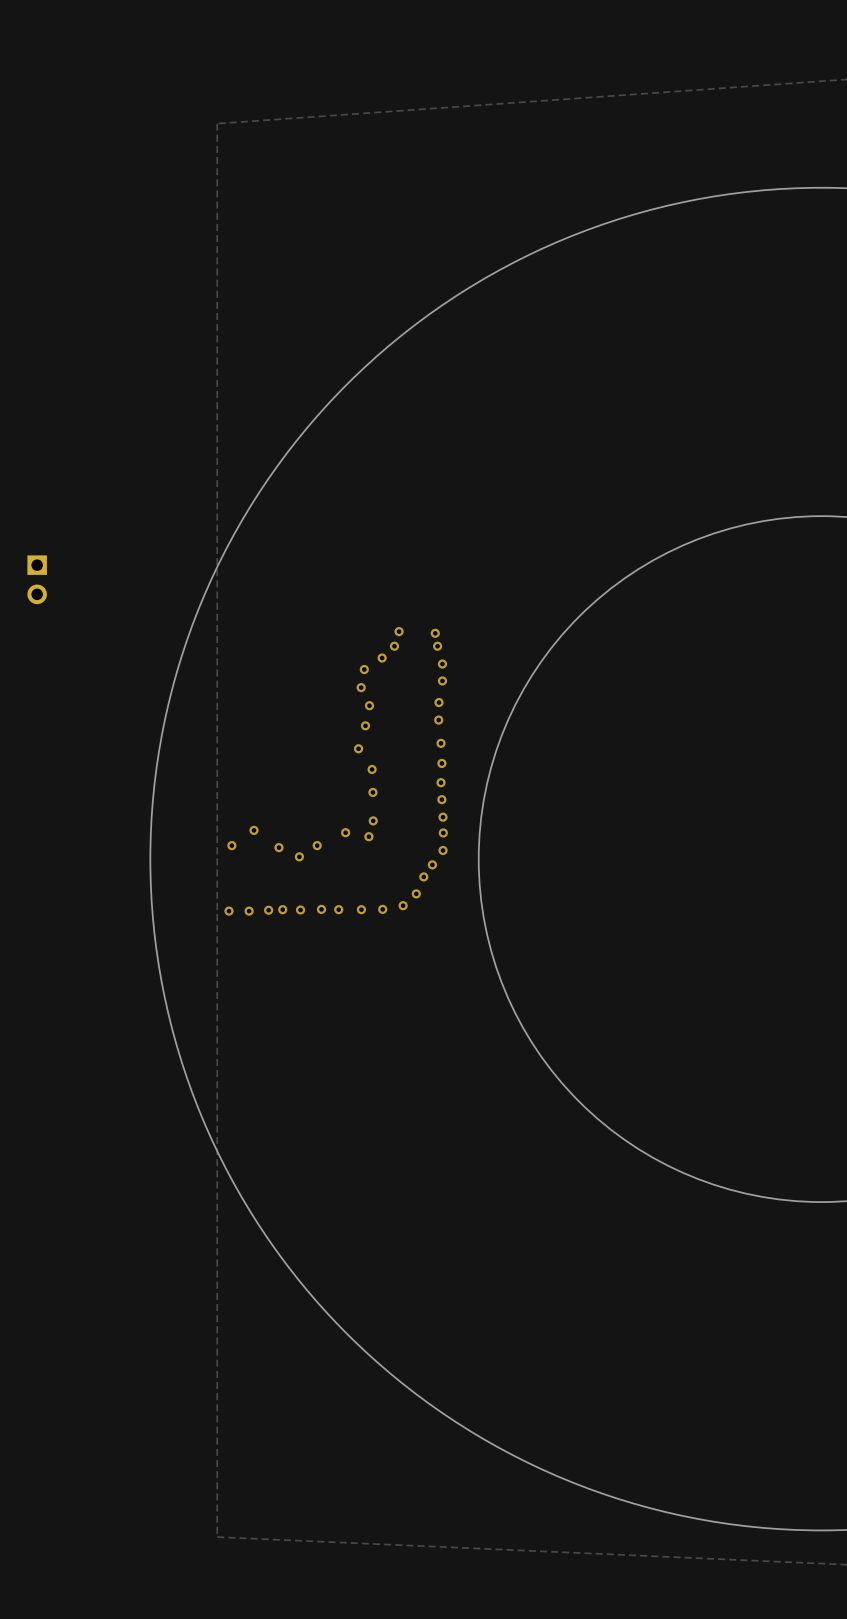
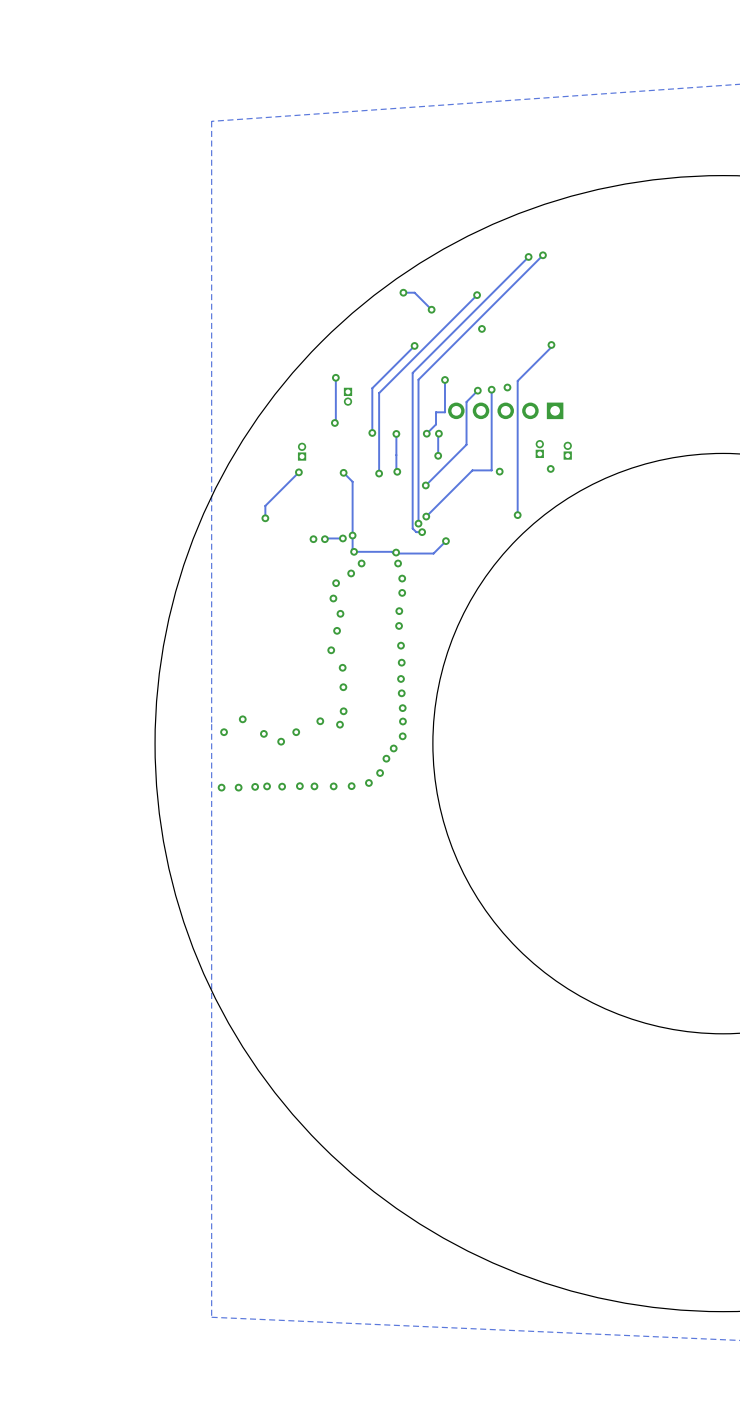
track: none -> (542, 255) (418, 379) (418, 523)
via: none -> (542, 255)
track: none -> (528, 256) (412, 372) (412, 528) (416, 532) (422, 532)
via: none -> (528, 256)
track: none -> (403, 292) (414, 292) (431, 309)
via: none -> (403, 292)
track: none -> (477, 295) (379, 393) (379, 473)
via: none -> (477, 295)
via: none -> (431, 309)
via: none -> (481, 328)
track: none -> (551, 344) (517, 380) (517, 515)
via: none -> (551, 344)
track: none -> (414, 345) (372, 388) (372, 432)
via: none -> (414, 345)
track: none -> (335, 377) (334, 423)
via: none -> (335, 377)
track: none -> (444, 379) (444, 412) (436, 412) (436, 424) (426, 433)
via: none -> (444, 379)
via: none -> (507, 387)
track: none -> (491, 389) (491, 470) (472, 470) (426, 516)
via: none -> (491, 389)
track: none -> (477, 390) (466, 401) (466, 444) (425, 485)
via: none -> (477, 390)
part: none -> (348, 396)
part: none -> (505, 410)
via: none -> (334, 423)
via: none -> (372, 432)
via: none -> (426, 433)
track: none -> (438, 433) (438, 455)
via: none -> (438, 433)
track: none -> (396, 433) (397, 471)
via: none -> (396, 433)
part: none -> (539, 449)
part: none -> (567, 450)
part: none -> (302, 451)
via: none -> (438, 455)
via: none -> (550, 468)
via: none -> (397, 471)
via: none -> (499, 471)
track: none -> (298, 472) (265, 505) (265, 518)
via: none -> (298, 472)
track: none -> (343, 472) (352, 481) (352, 550)
via: none -> (343, 472)
via: none -> (379, 473)
via: none -> (425, 485)
part: (37, 579) -> none
via: none -> (517, 515)
via: none -> (426, 516)
via: none -> (265, 518)
via: none -> (418, 523)
via: none -> (422, 532)
via: none -> (352, 535)
track: none -> (342, 538) (324, 539)
via: none -> (342, 538)
via: none -> (313, 539)
via: none -> (324, 539)
track: none -> (445, 541) (433, 553) (354, 551) (351, 549)
via: none -> (445, 541)
via: (399, 631) -> none
via: none -> (354, 551)

